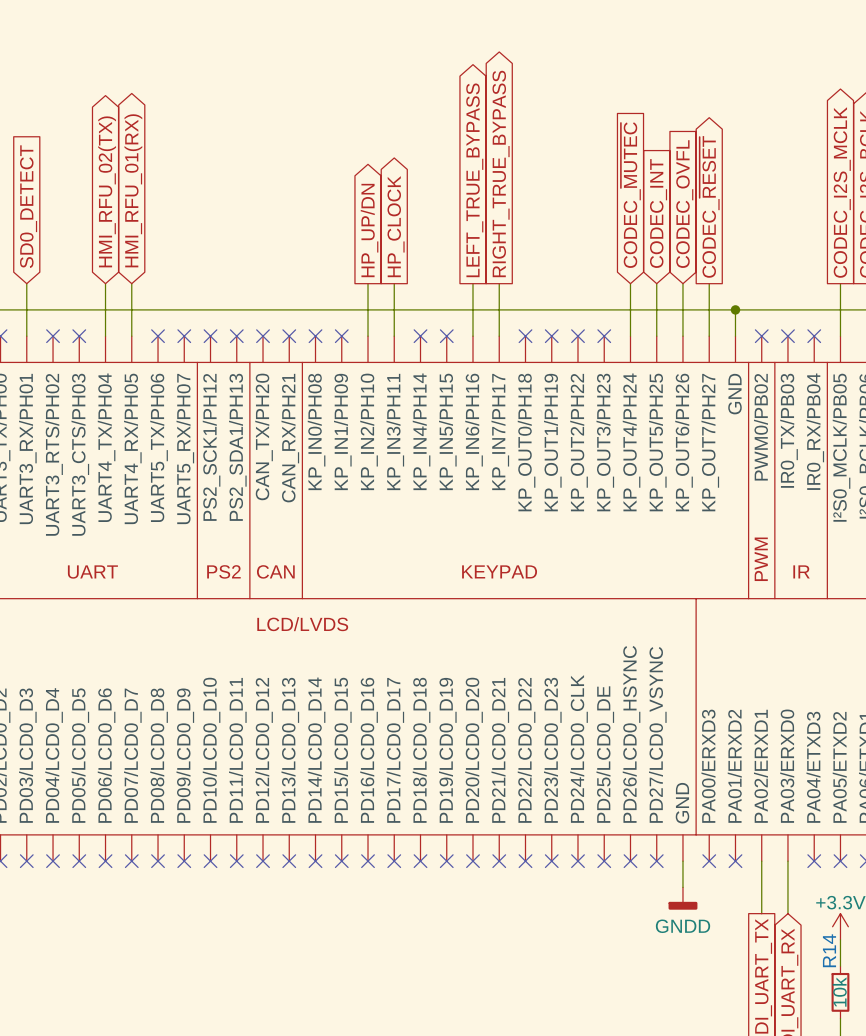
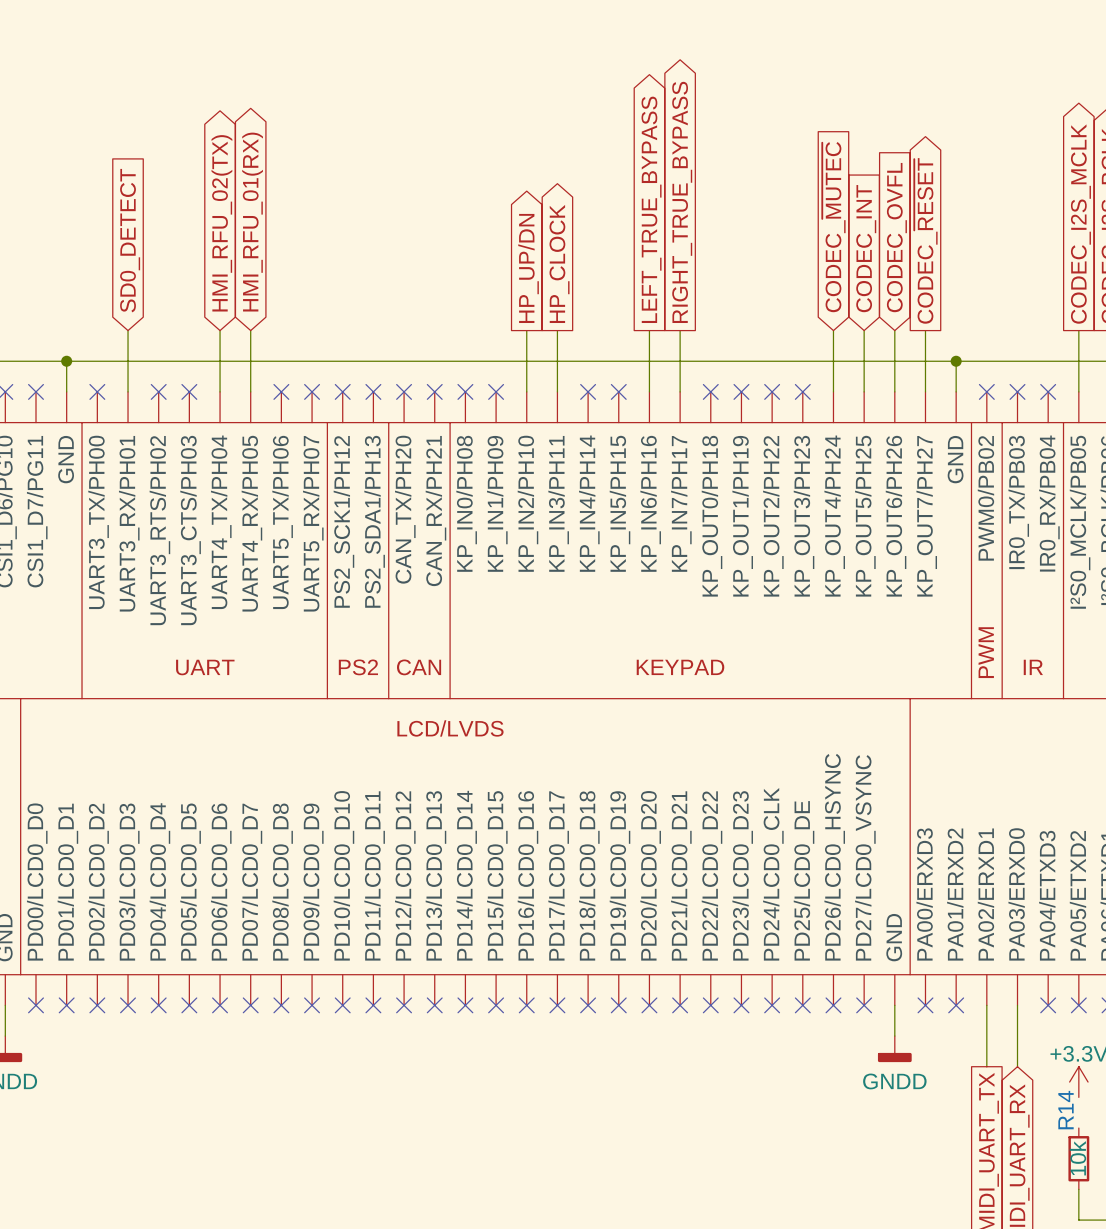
wire: (840, 939) (840, 966) -> none

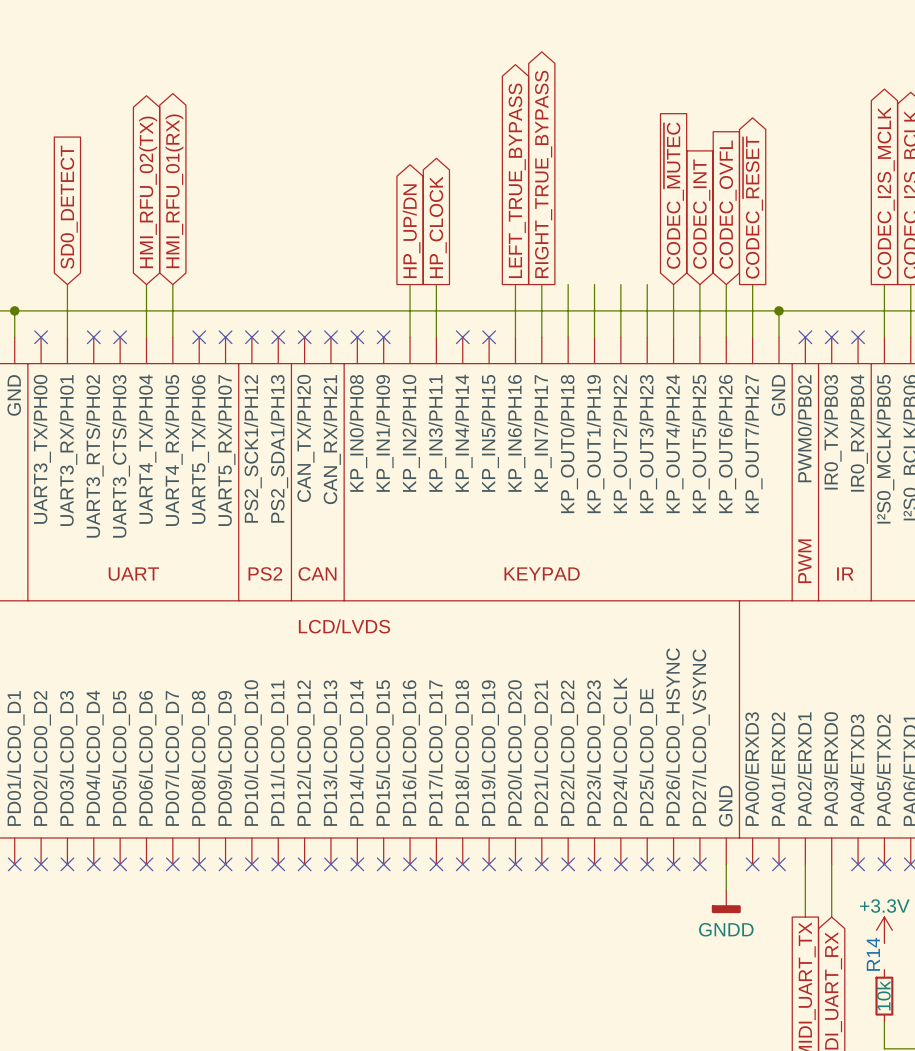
wire: none -> (568, 284) (568, 337)
wire: none -> (594, 284) (594, 337)
wire: none -> (620, 284) (620, 337)
wire: none -> (647, 284) (647, 337)
no-connect mark: (710, 391) -> none
no-connect mark: (741, 391) -> none
no-connect mark: (772, 391) -> none
no-connect mark: (802, 391) -> none

